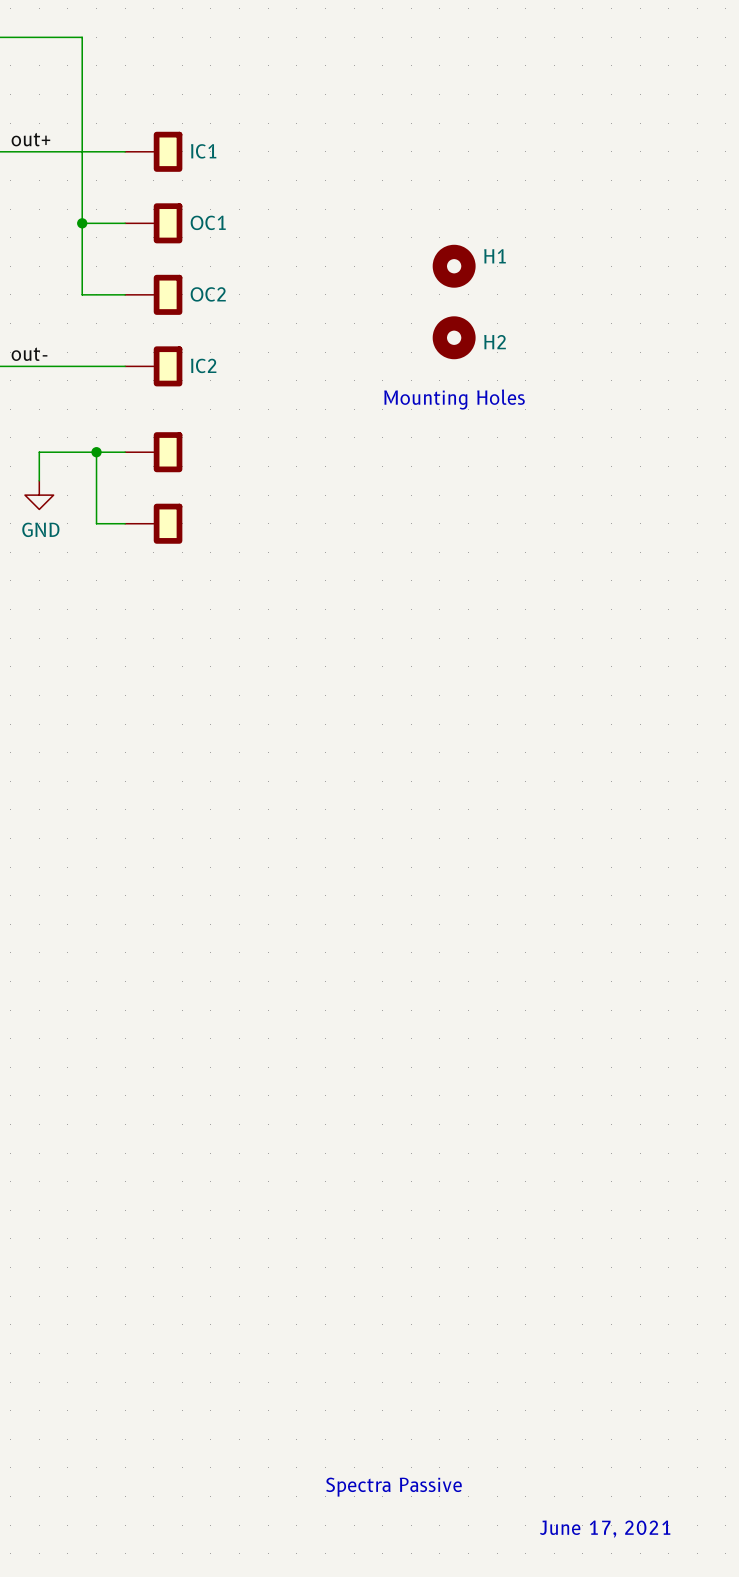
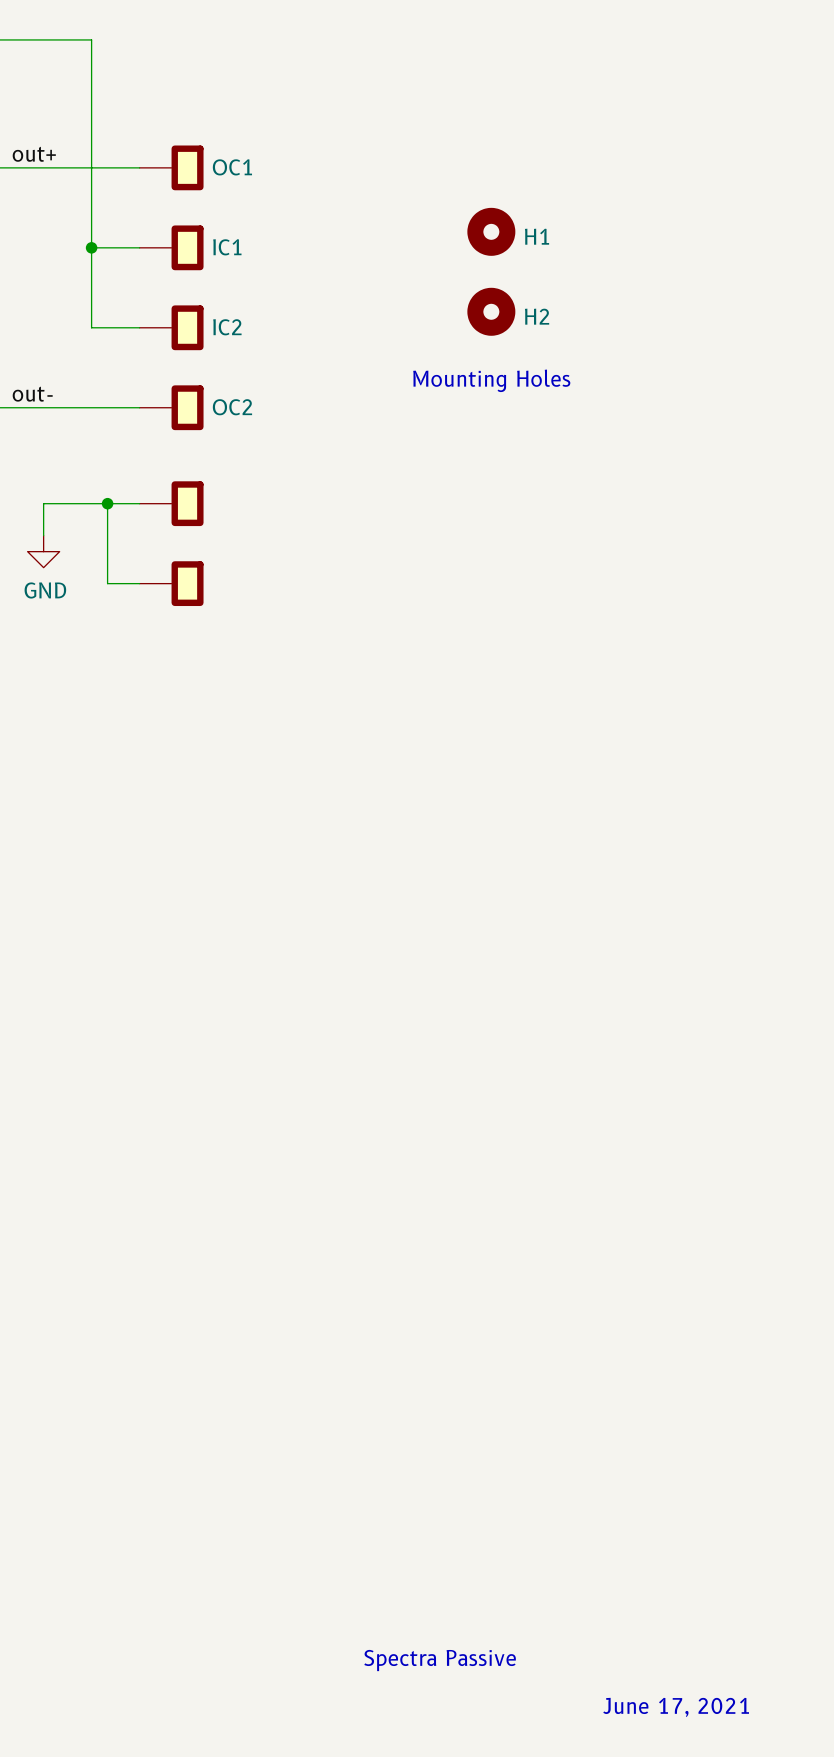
IC1 name: IC1 (203, 151) -> OC1 (232, 167)
OC1 name: OC1 (208, 222) -> IC1 (227, 247)
H1 name position: H1 (494, 256) -> H1 (537, 236)
H1 position: (454, 266) -> (491, 231)
OC2 name: OC2 (208, 294) -> IC2 (227, 327)
H2 position: (454, 337) -> (491, 311)
IC2 name: IC2 (203, 365) -> OC2 (232, 407)
text position: Mounting Holes (454, 399) -> Mounting Holes (491, 380)

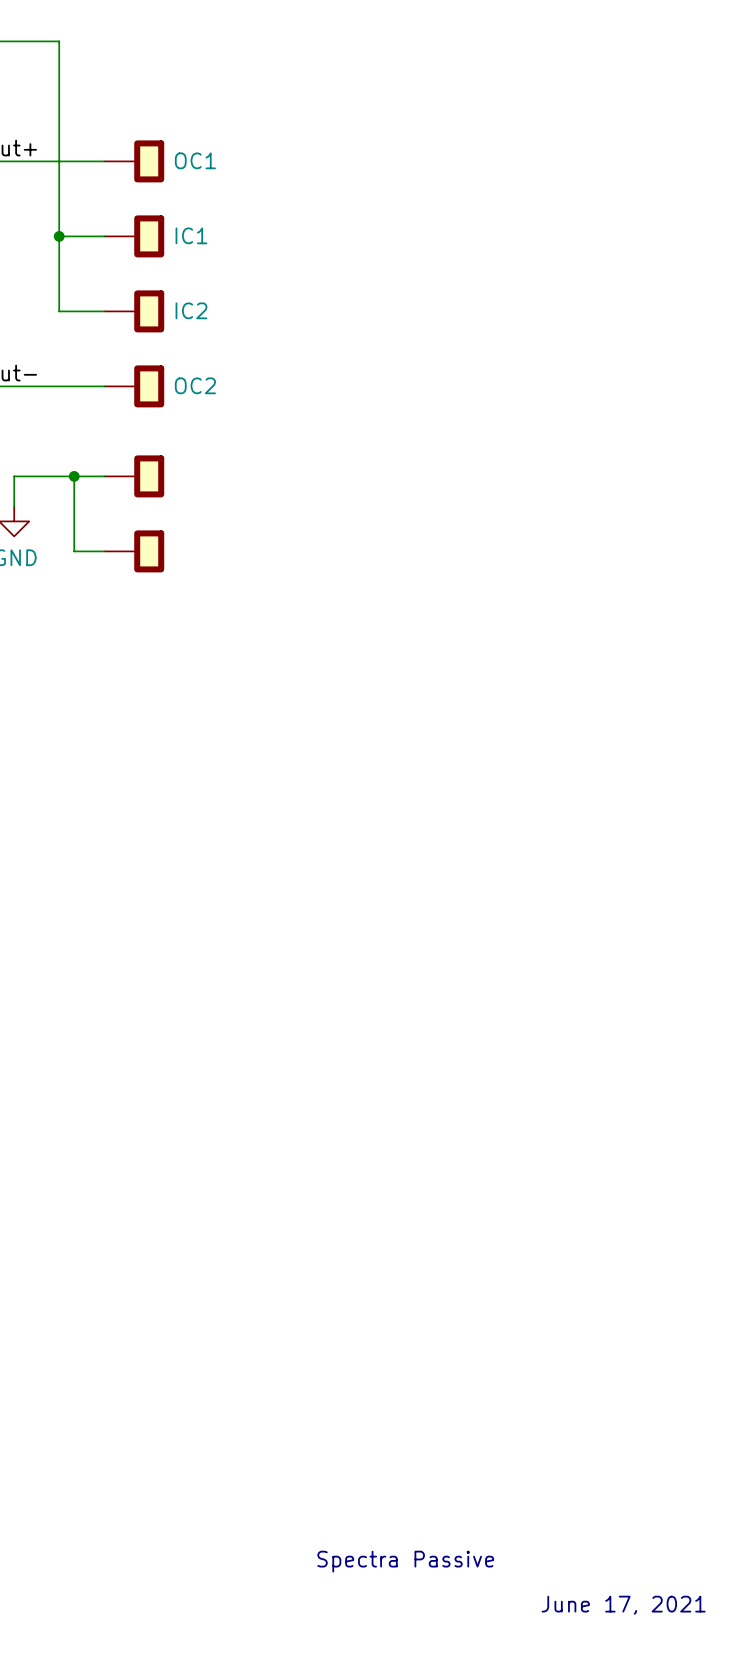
H1: (491, 231) -> none
H2: (491, 311) -> none
text: Mounting Holes (491, 380) -> none

